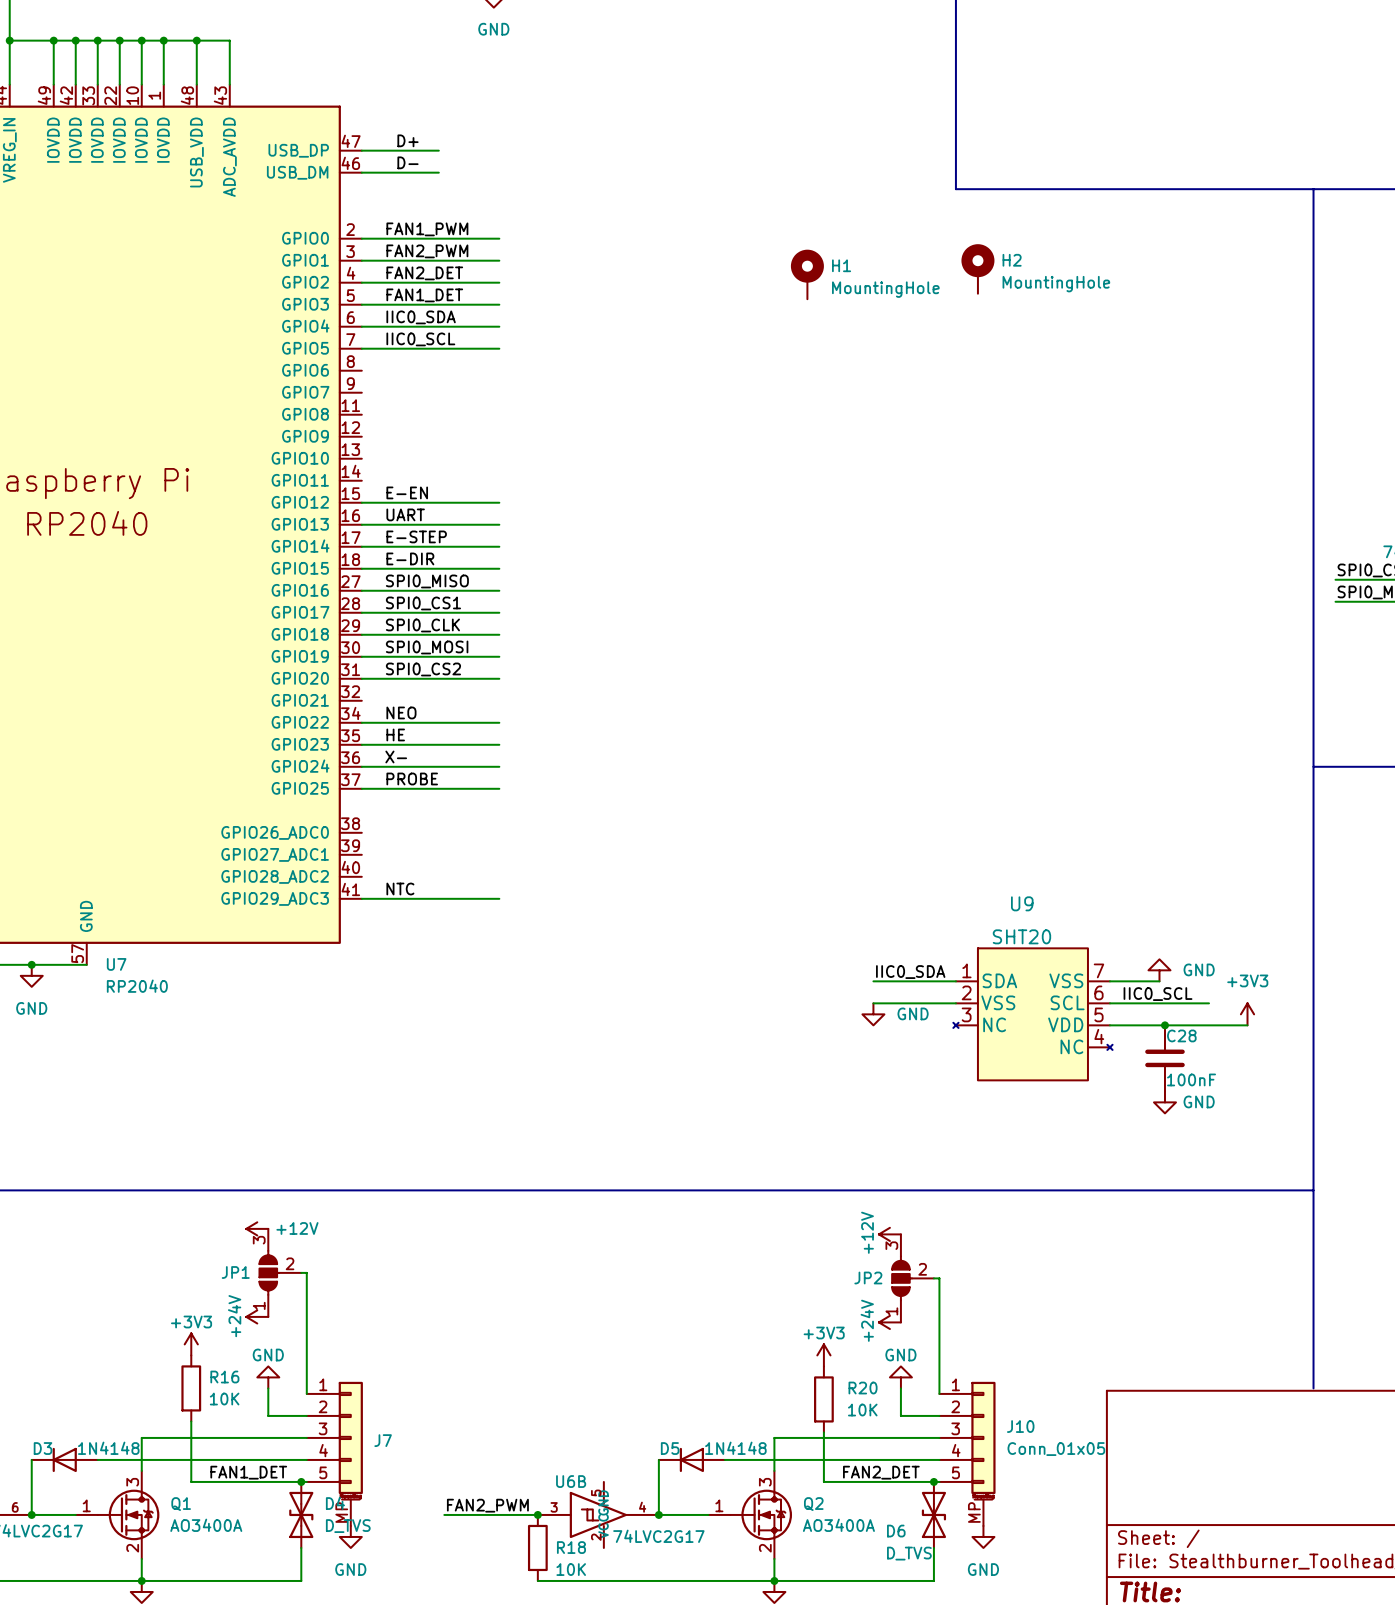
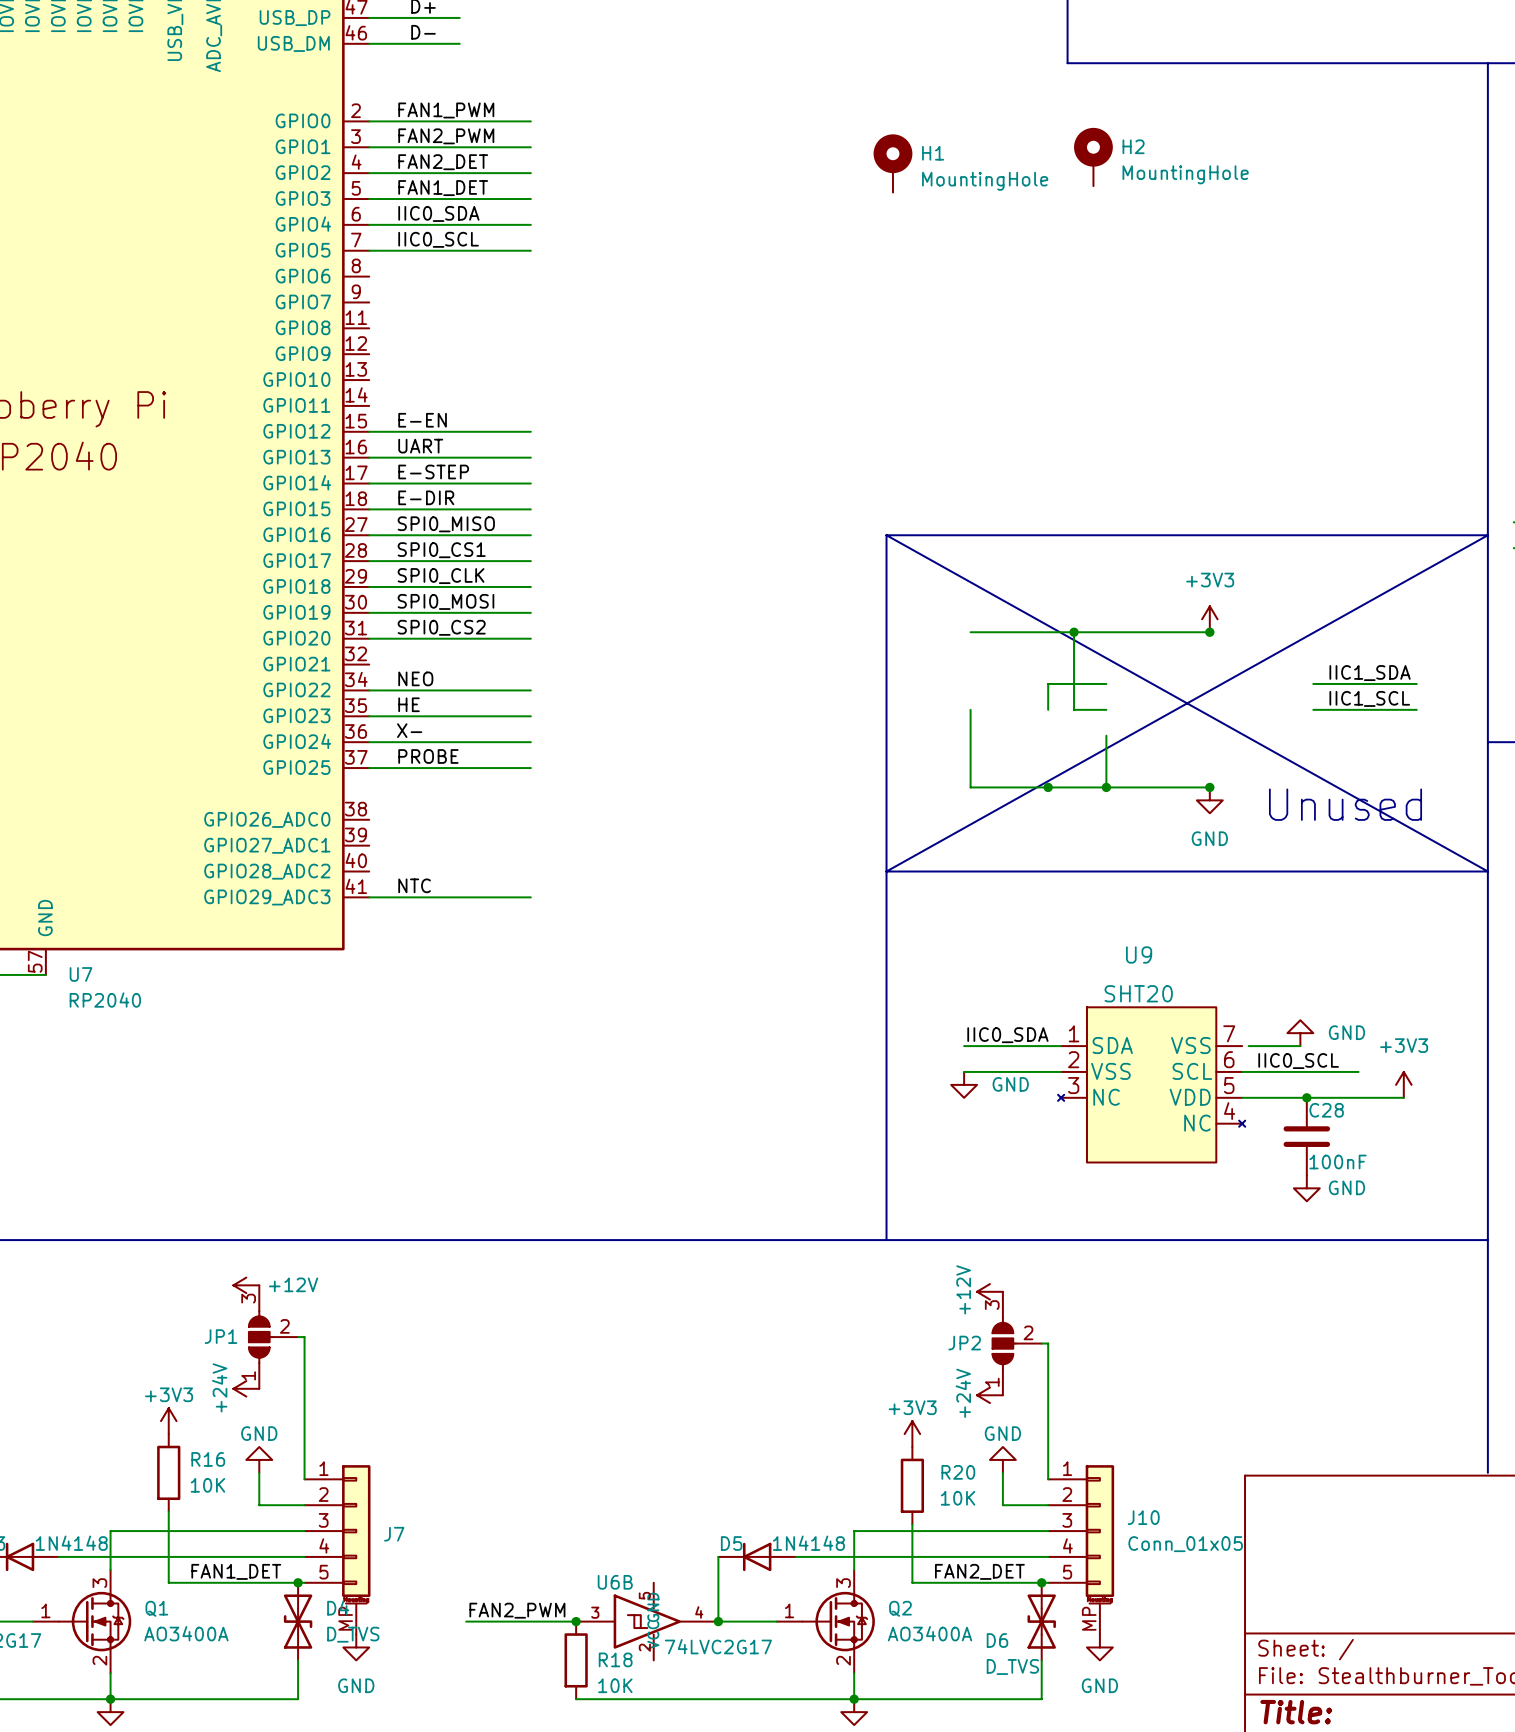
line: none -> (886, 535) (886, 1240)
line: none -> (886, 535) (1487, 535) (886, 871) (1487, 871) (886, 535)
power symbol: none -> +3V3 (1209, 619)
wire: none -> (970, 632) (1209, 632)
wire: none -> (1074, 632) (1074, 709) (1106, 709)
junction: none -> (1074, 632)
junction: none -> (1209, 632)
label: none -> IIC1_SDA (1370, 673)
wire: none -> (1106, 683) (1048, 683) (1048, 709)
wire: none -> (1313, 683) (1416, 683)
label: none -> IIC1_SCL (1369, 698)
wire: none -> (970, 709) (970, 787) (1209, 787)
wire: none -> (1313, 709) (1416, 709)
wire: none -> (1106, 735) (1106, 787)
junction: none -> (1048, 787)
junction: none -> (1106, 787)
junction: none -> (1209, 787)
power symbol: none -> GND (1209, 800)
text: none -> Unused (1345, 804)
power symbol: GND (1159, 970) -> none
label position: IIC0_SDA (910, 972) -> IIC0_SDA (1007, 1035)
wire: (873, 981) (955, 981) -> (964, 1046) (1061, 1046)
wire: (1109, 981) (1159, 981) -> none
label position: IIC0_SCL (1158, 994) -> IIC0_SCL (1298, 1061)
wire: (873, 1003) (955, 1003) -> (964, 1071) (1061, 1071)
wire: (1109, 1003) (1209, 1003) -> (1242, 1071) (1358, 1071)
power symbol position: GND (873, 1014) -> GND (964, 1084)
U9 position: (1032, 1014) -> (1151, 1084)
power symbol: none -> GND (1300, 1033)
power symbol position: +3V3 (1247, 1014) -> +3V3 (1403, 1084)
wire: (1153, 1025) (1247, 1025) -> none
junction position: (1164, 1025) -> (1306, 1097)
C28 position: (1164, 1058) -> (1306, 1136)
wire: none -> (1242, 1097) (1403, 1097)
power symbol: GND (1164, 1102) -> none
power symbol: none -> GND (1306, 1188)

